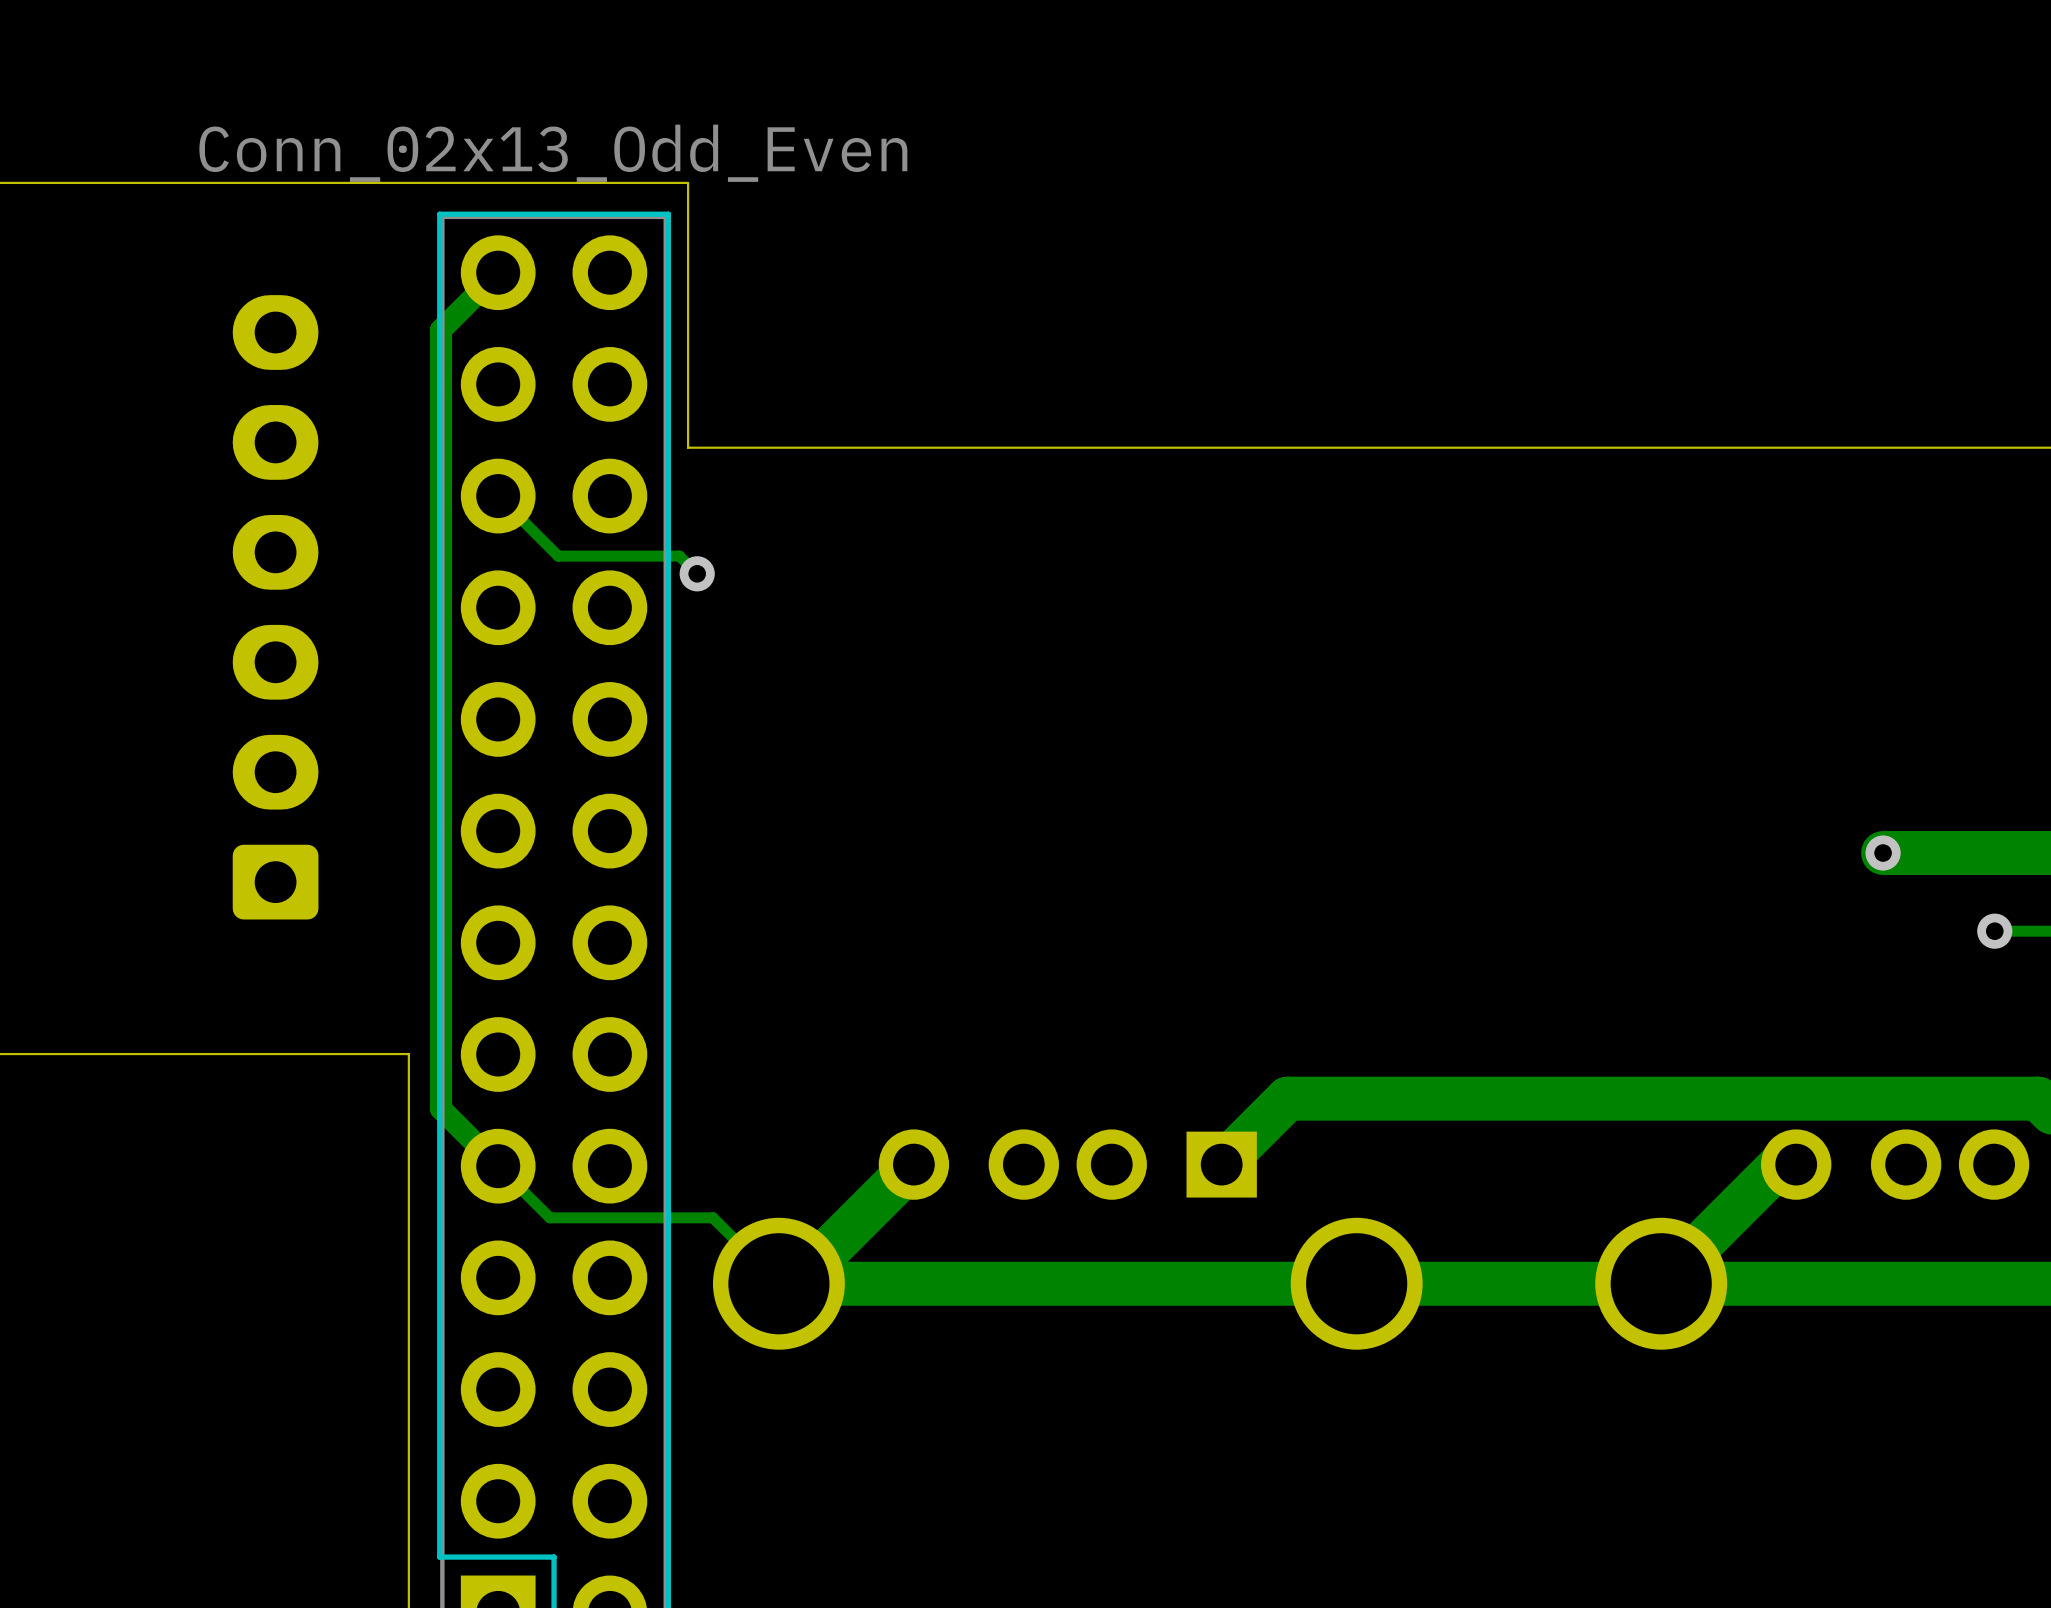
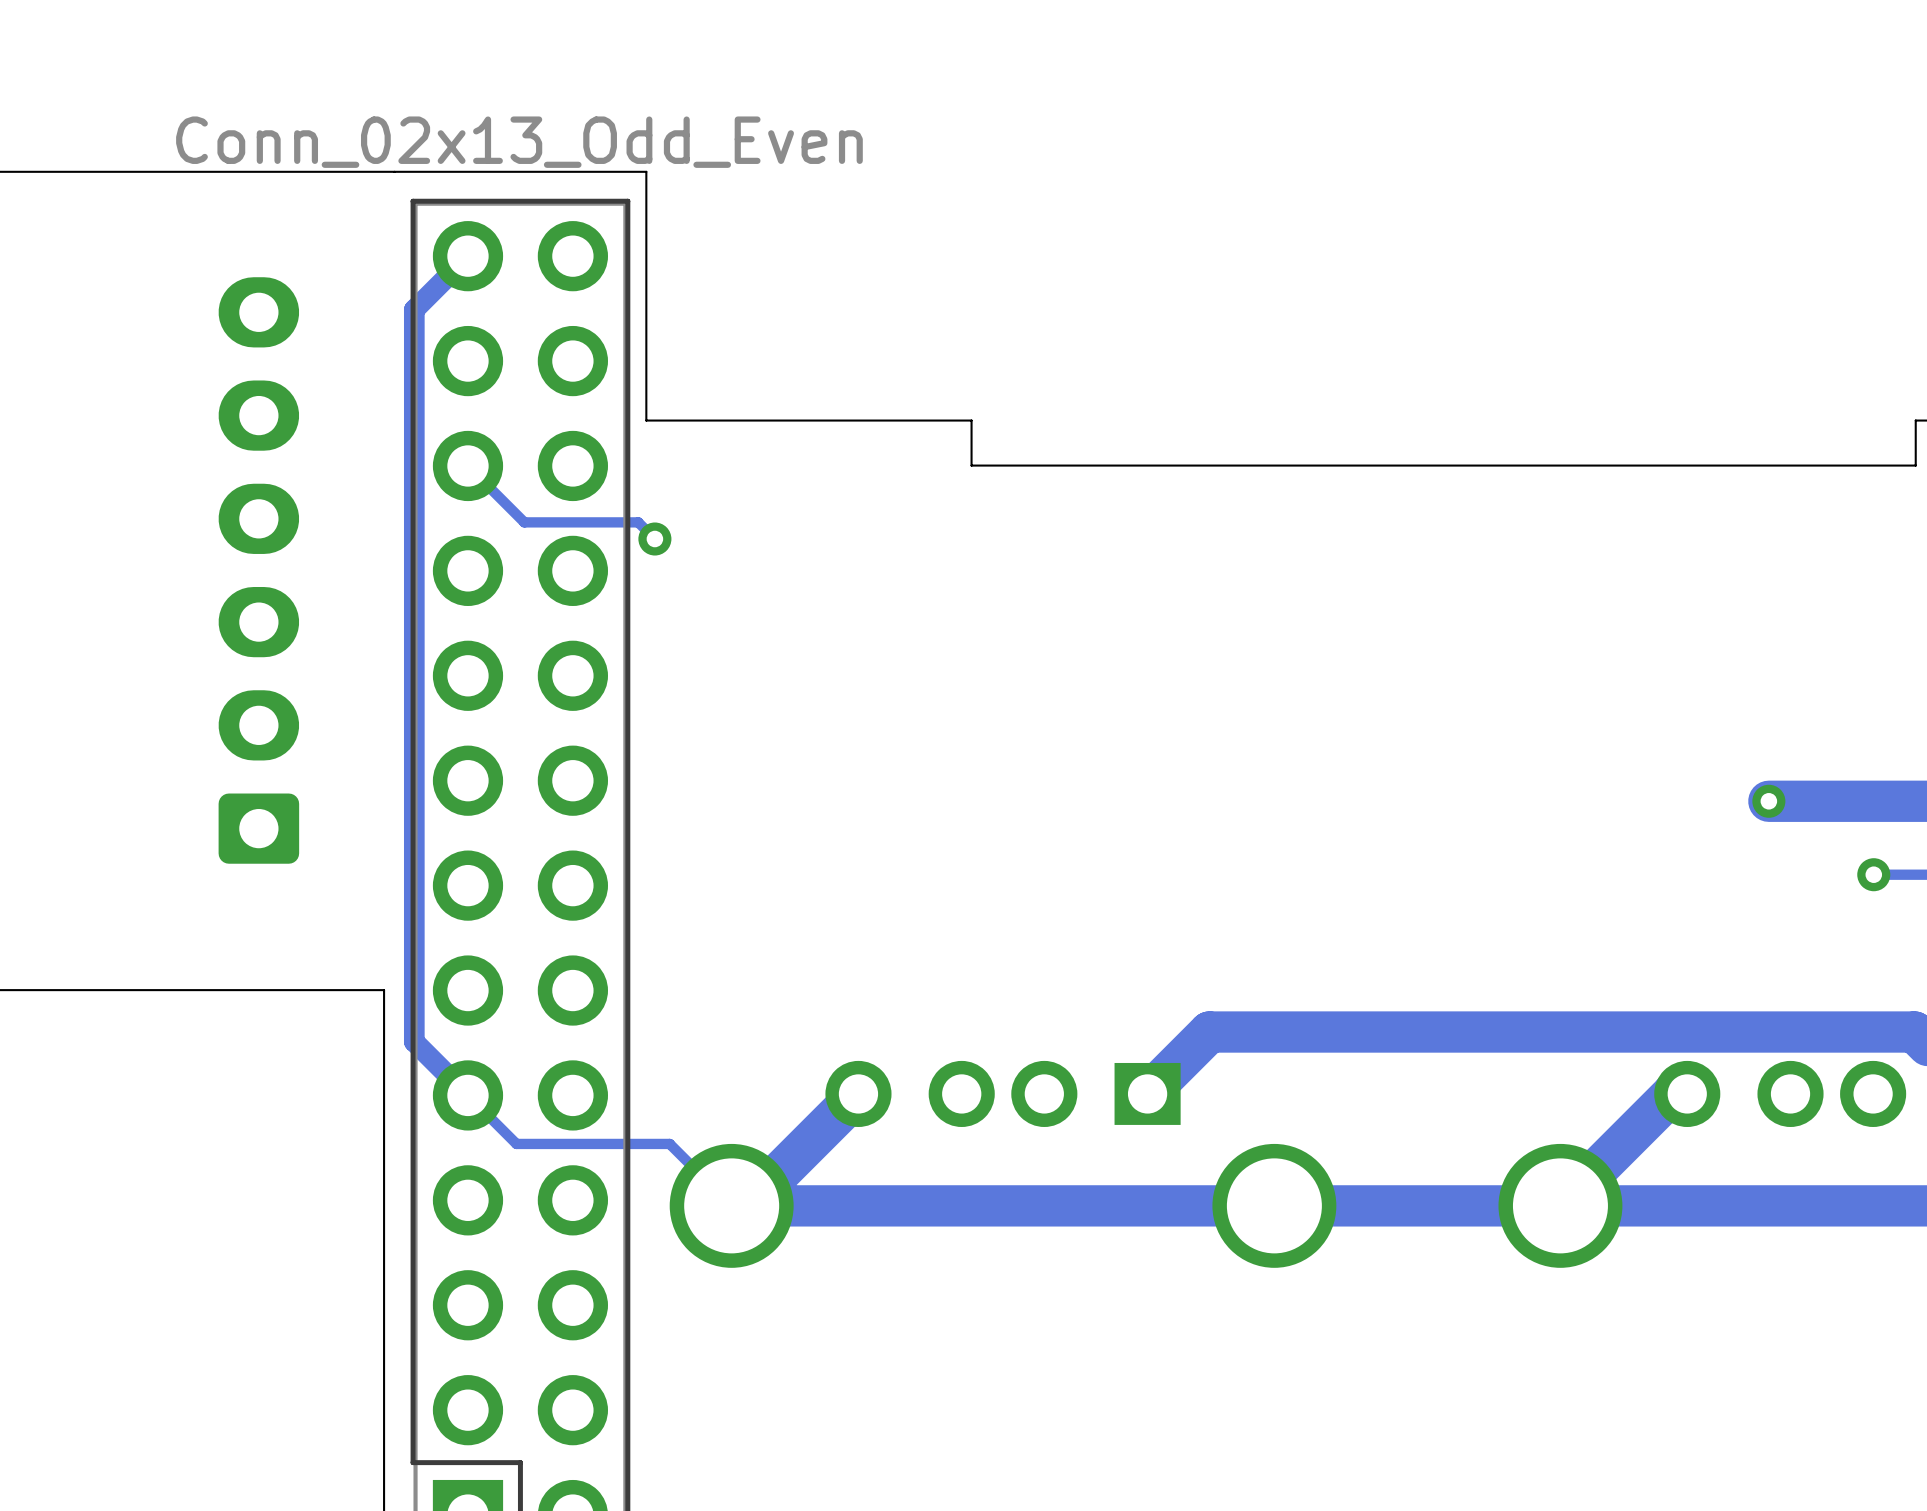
board edge: (2039, 447) (1034, 447) -> (1915, 420) (1915, 465) (971, 465) (971, 420)

